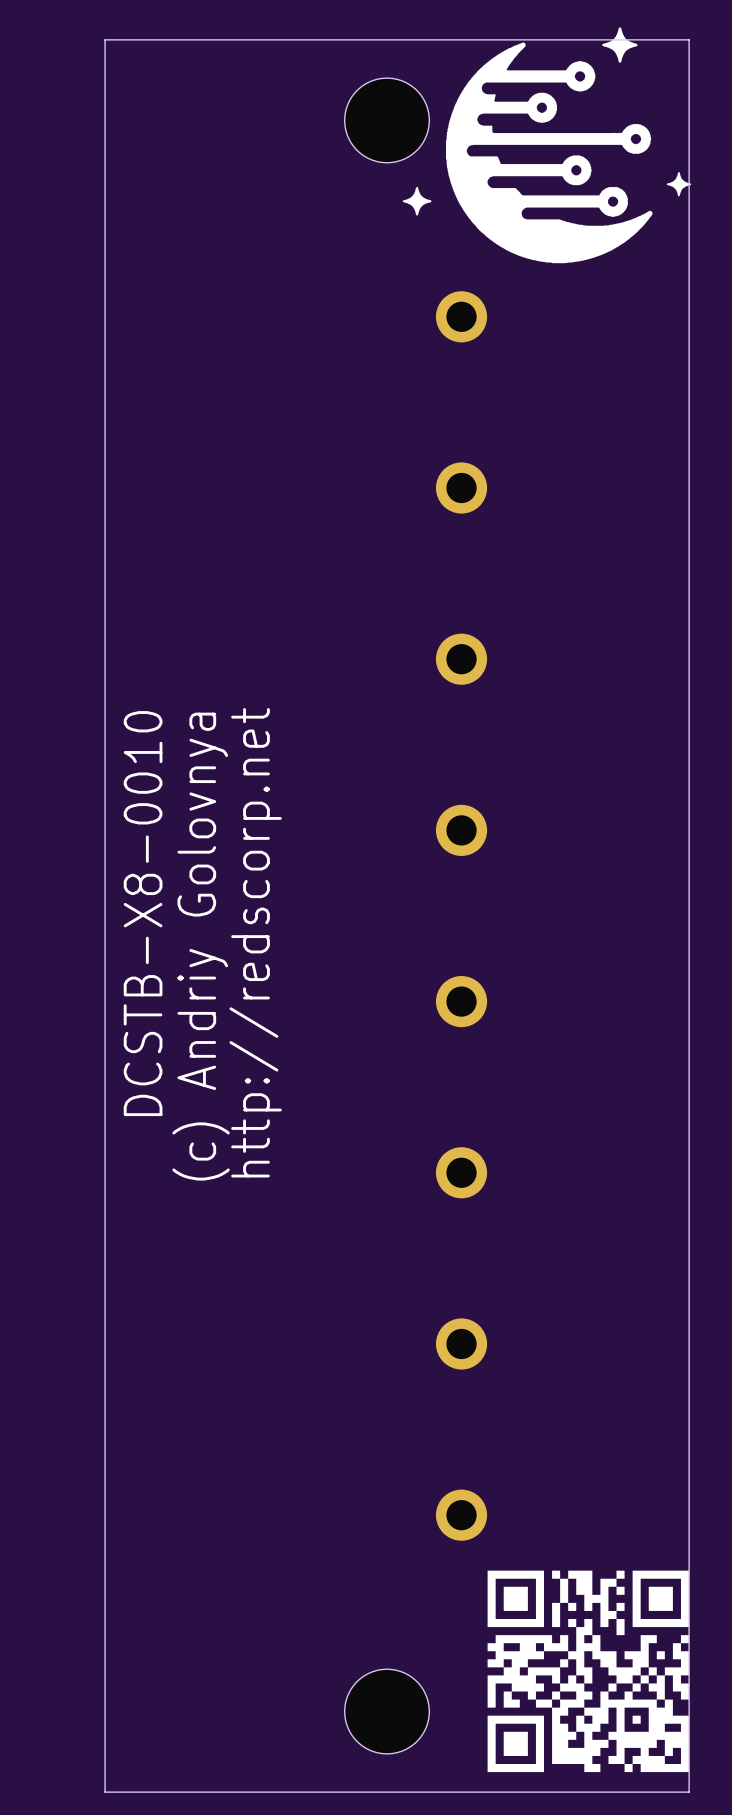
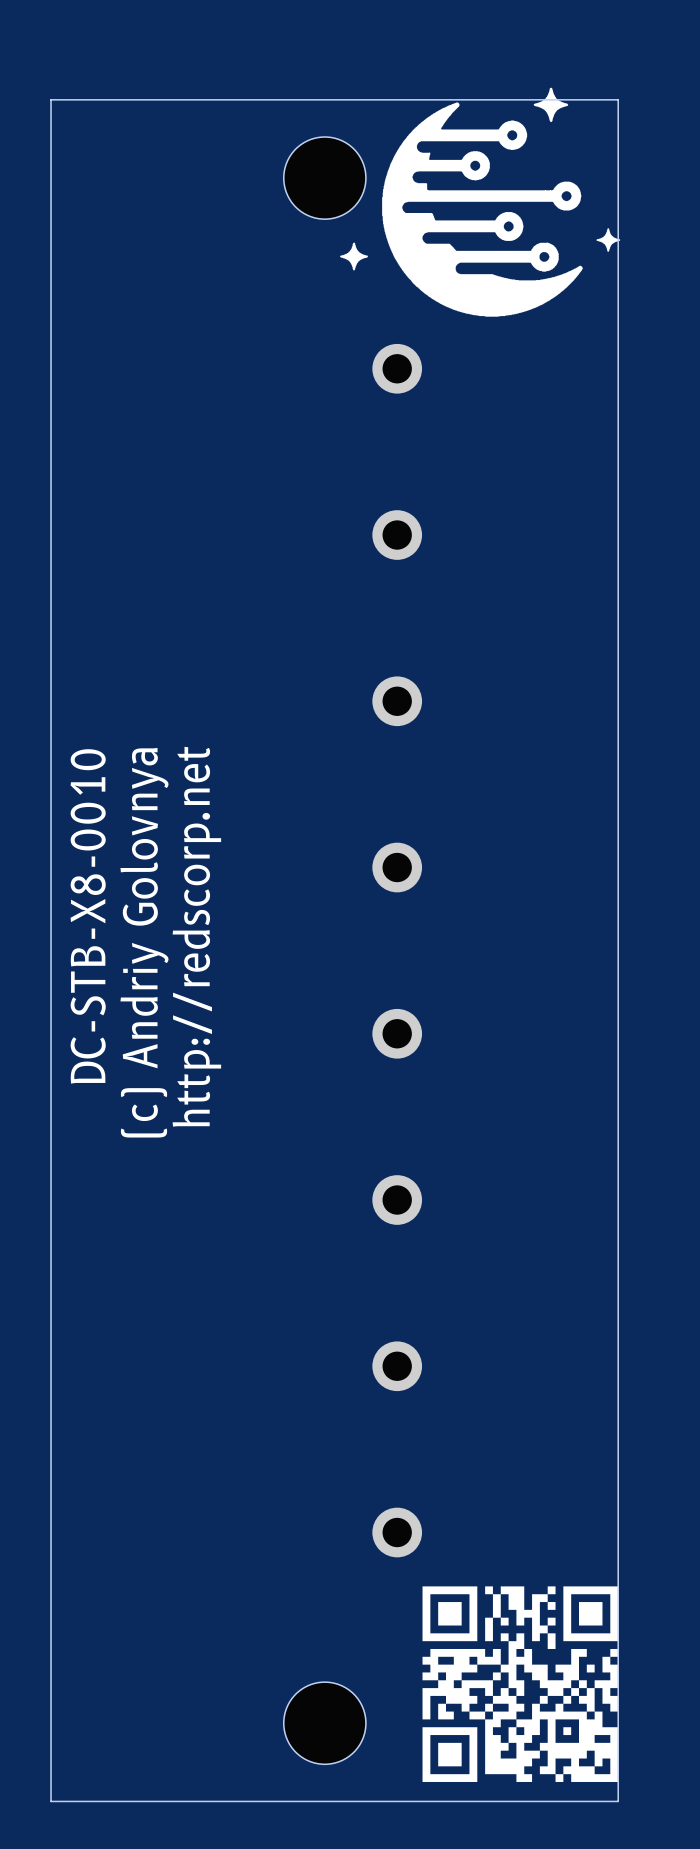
text: DCSTB-X8-0010 (143, 913) -> DC-STB-X8-0010 (88, 916)

